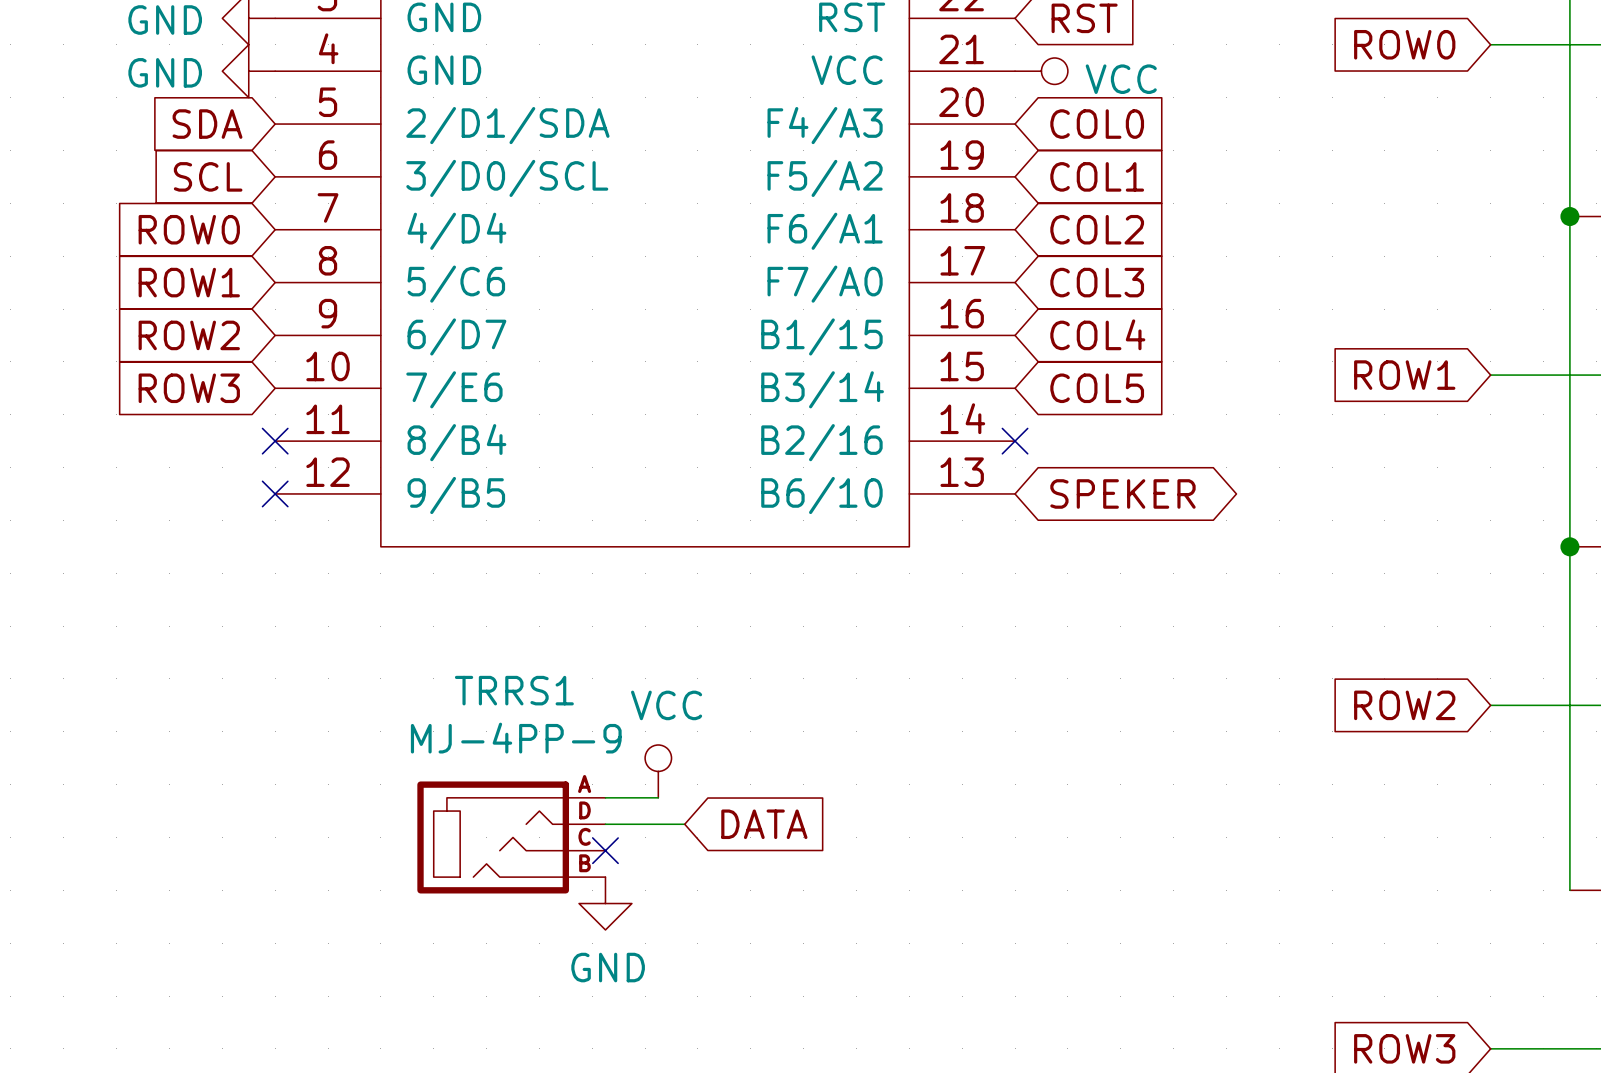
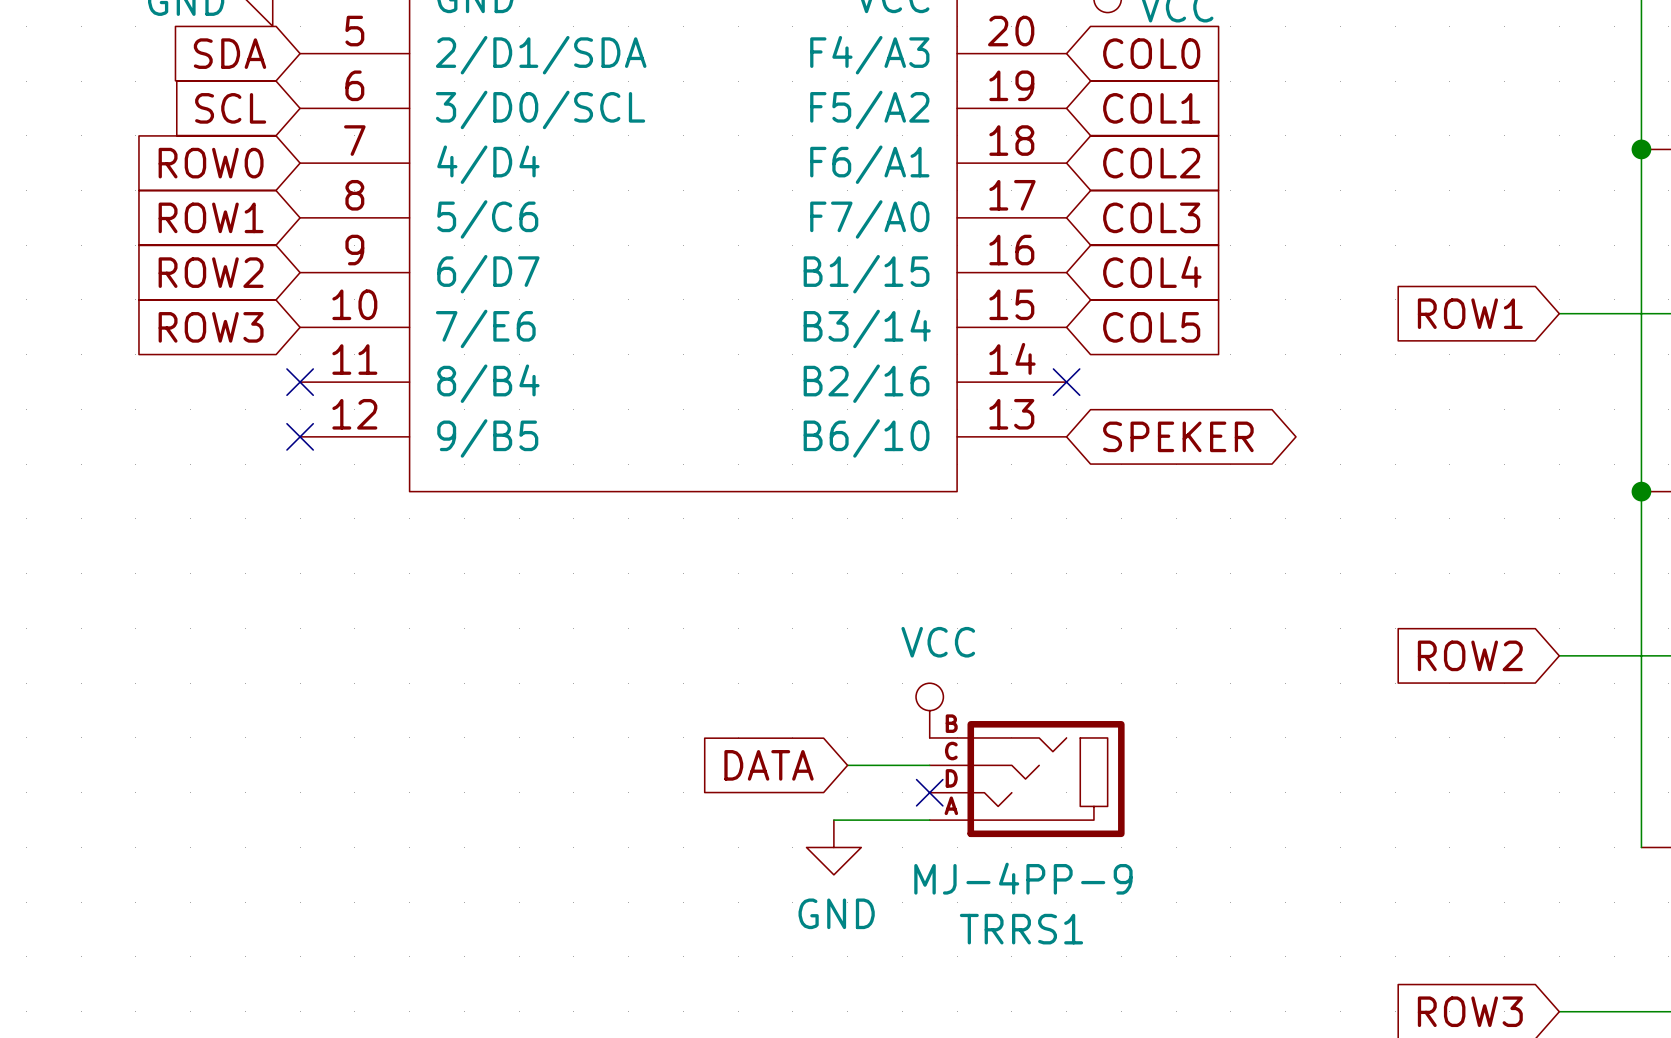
power symbol position: VCC (658, 771) -> VCC (929, 710)
wire: (605, 797) (658, 797) -> none
wire: (605, 824) (684, 824) -> (847, 765) (929, 765)
global label rotation: 0° (764, 824) -> 180° (769, 765)
TRRS1 rotation: 0° (493, 837) -> 180° (1046, 779)
TRRS1 position: (511, 837) -> (1027, 779)
no-connect mark: none -> (929, 792)
no-connect mark: (605, 850) -> none
wire: none -> (833, 820) (929, 820)
power symbol position: GND (605, 903) -> GND (833, 847)

